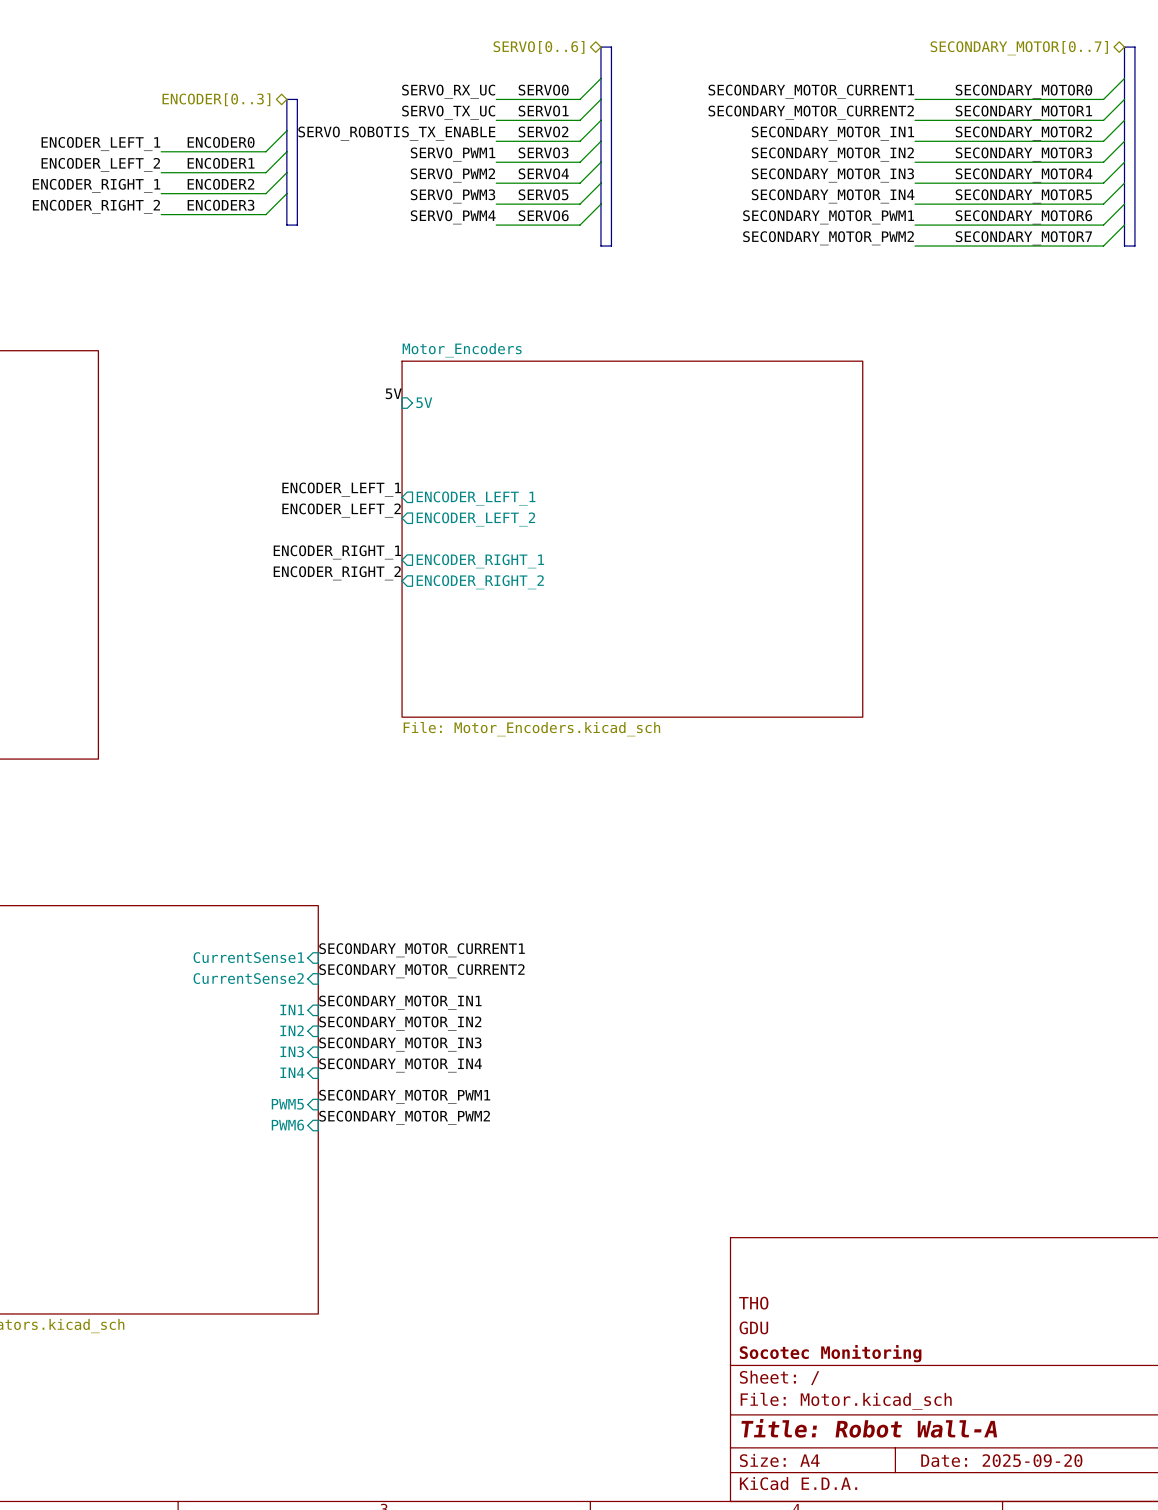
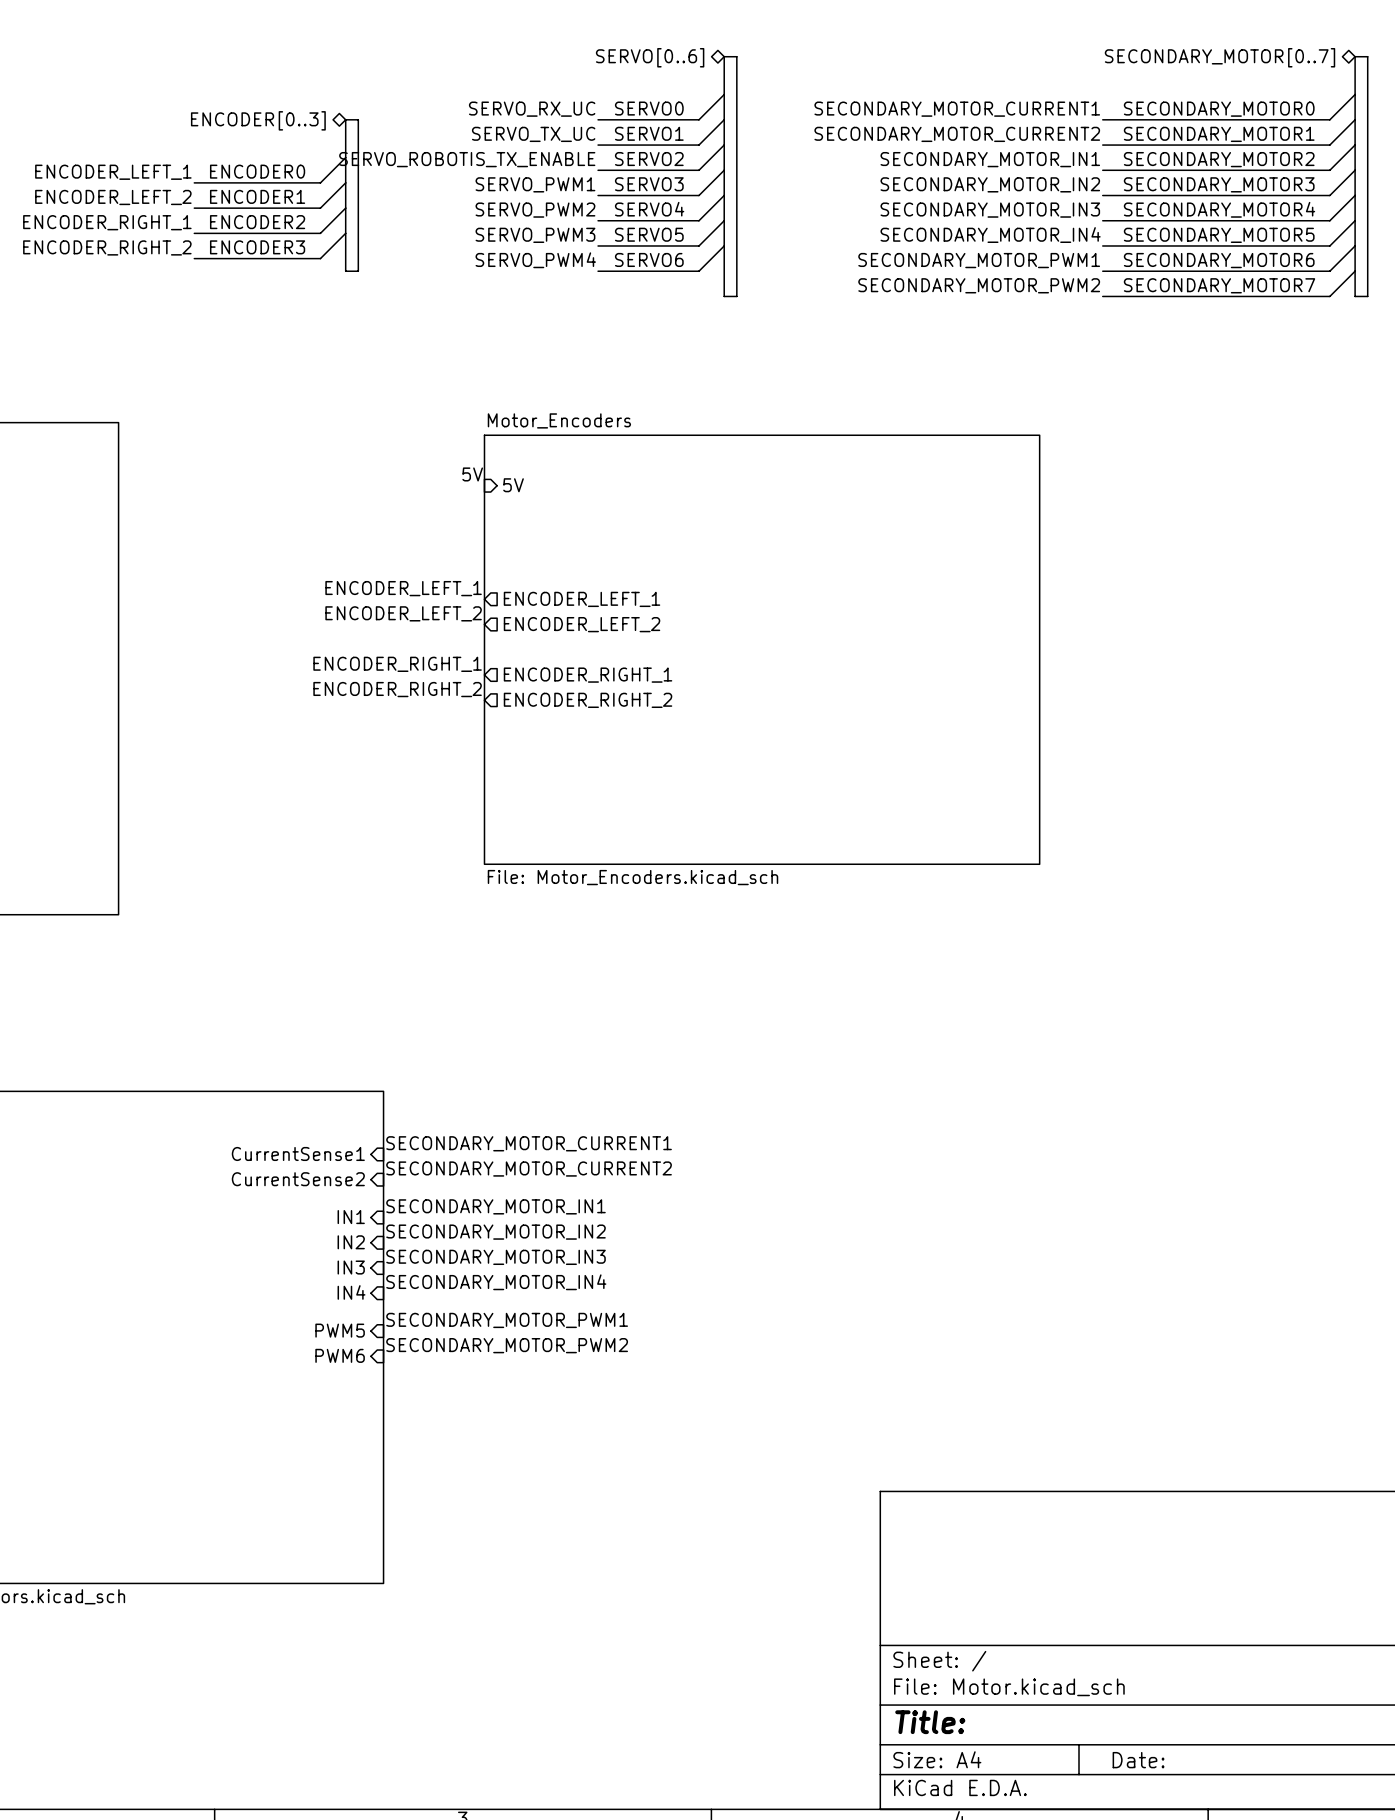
title block: THO (753, 1303) -> none
title block: GDU (753, 1327) -> none
title block: Socotec Monitoring (830, 1353) -> none
title block: Title: Robot Wall-A (869, 1428) -> Title: (930, 1722)
title block: Date: 2025-09-20 (1001, 1460) -> Date: (1138, 1760)

